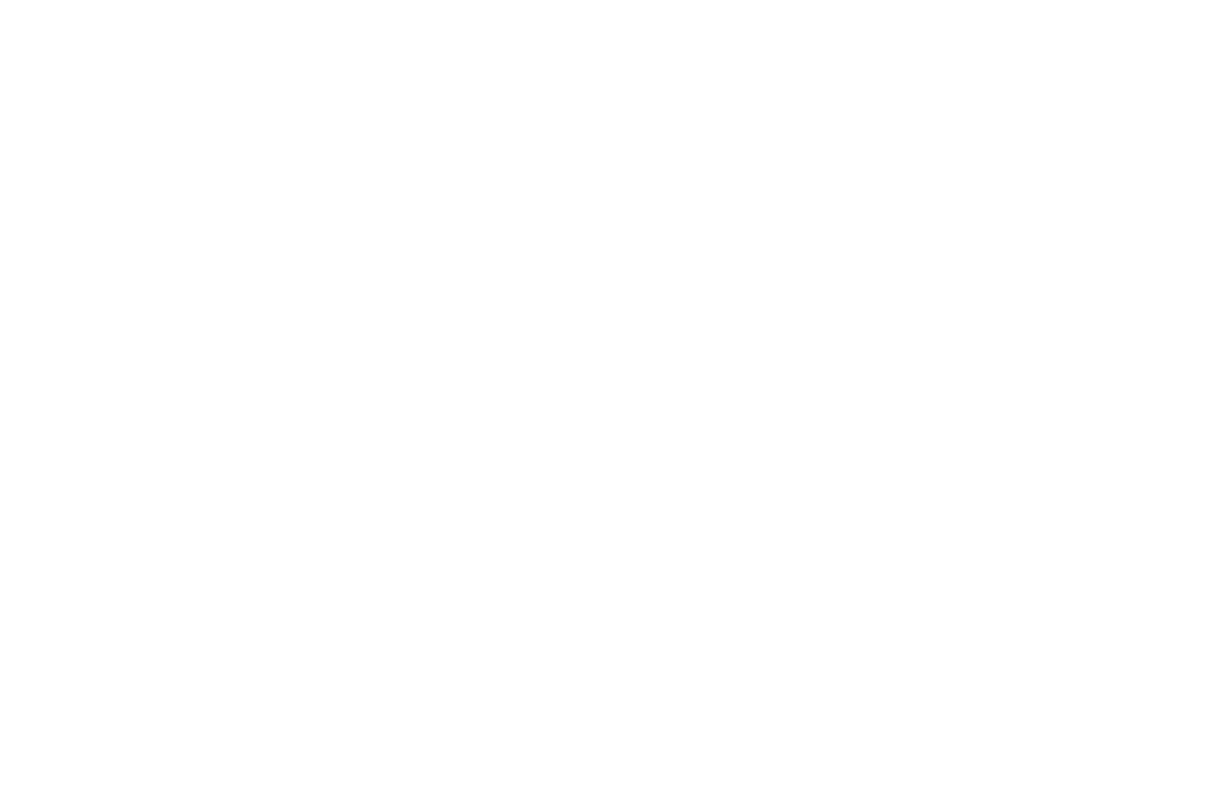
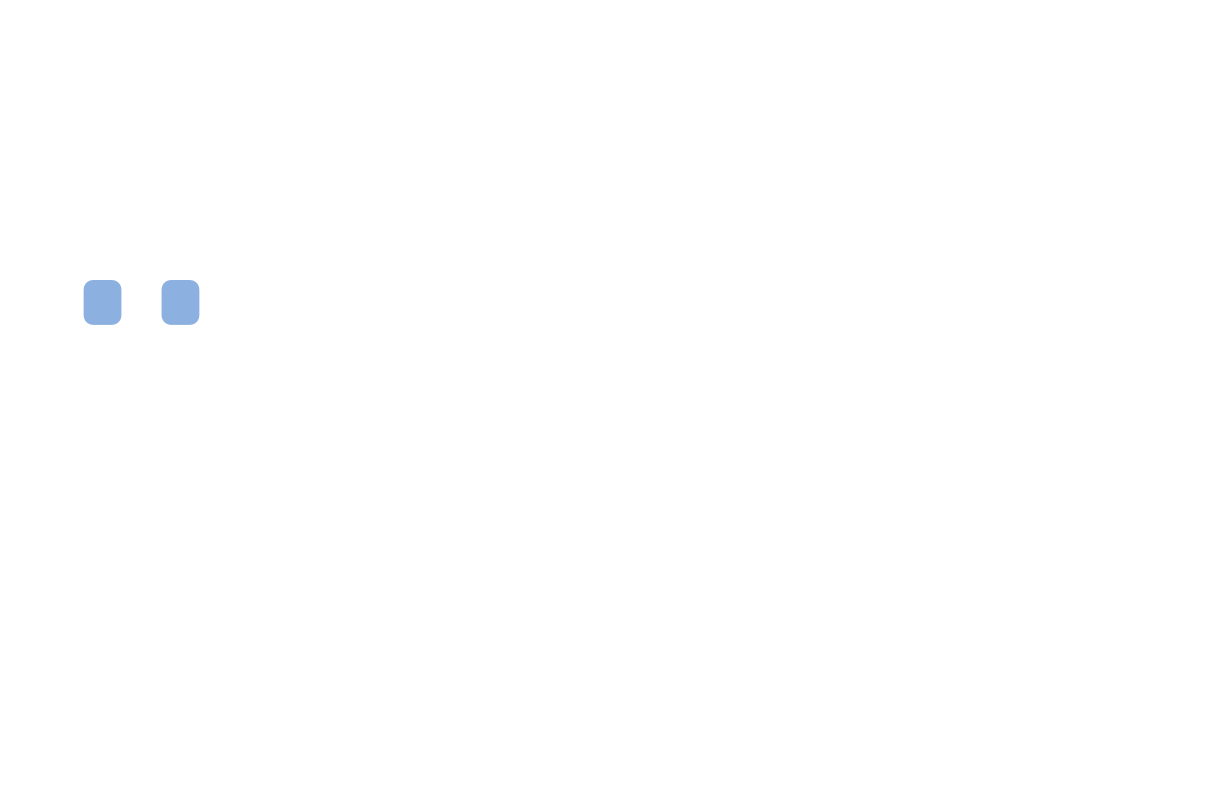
part: none -> (141, 302)

